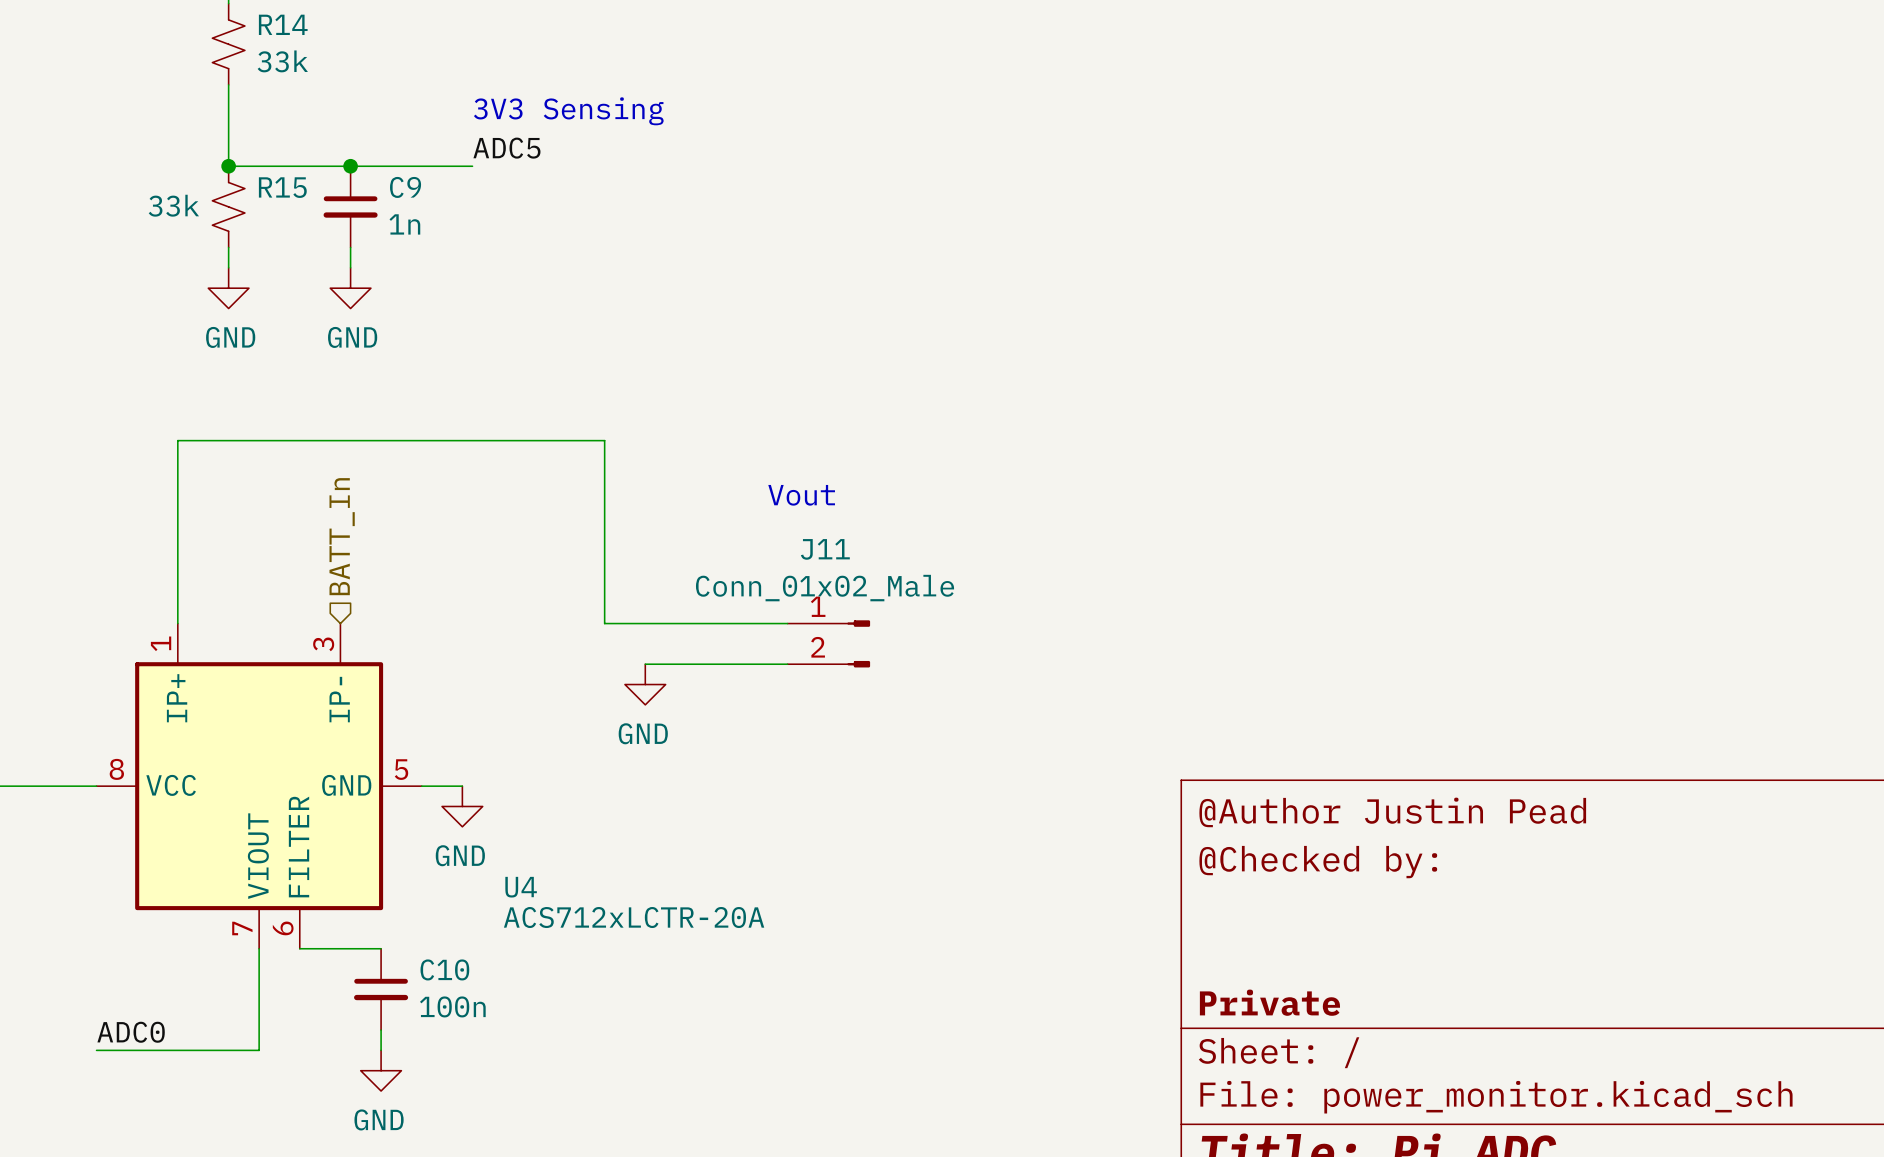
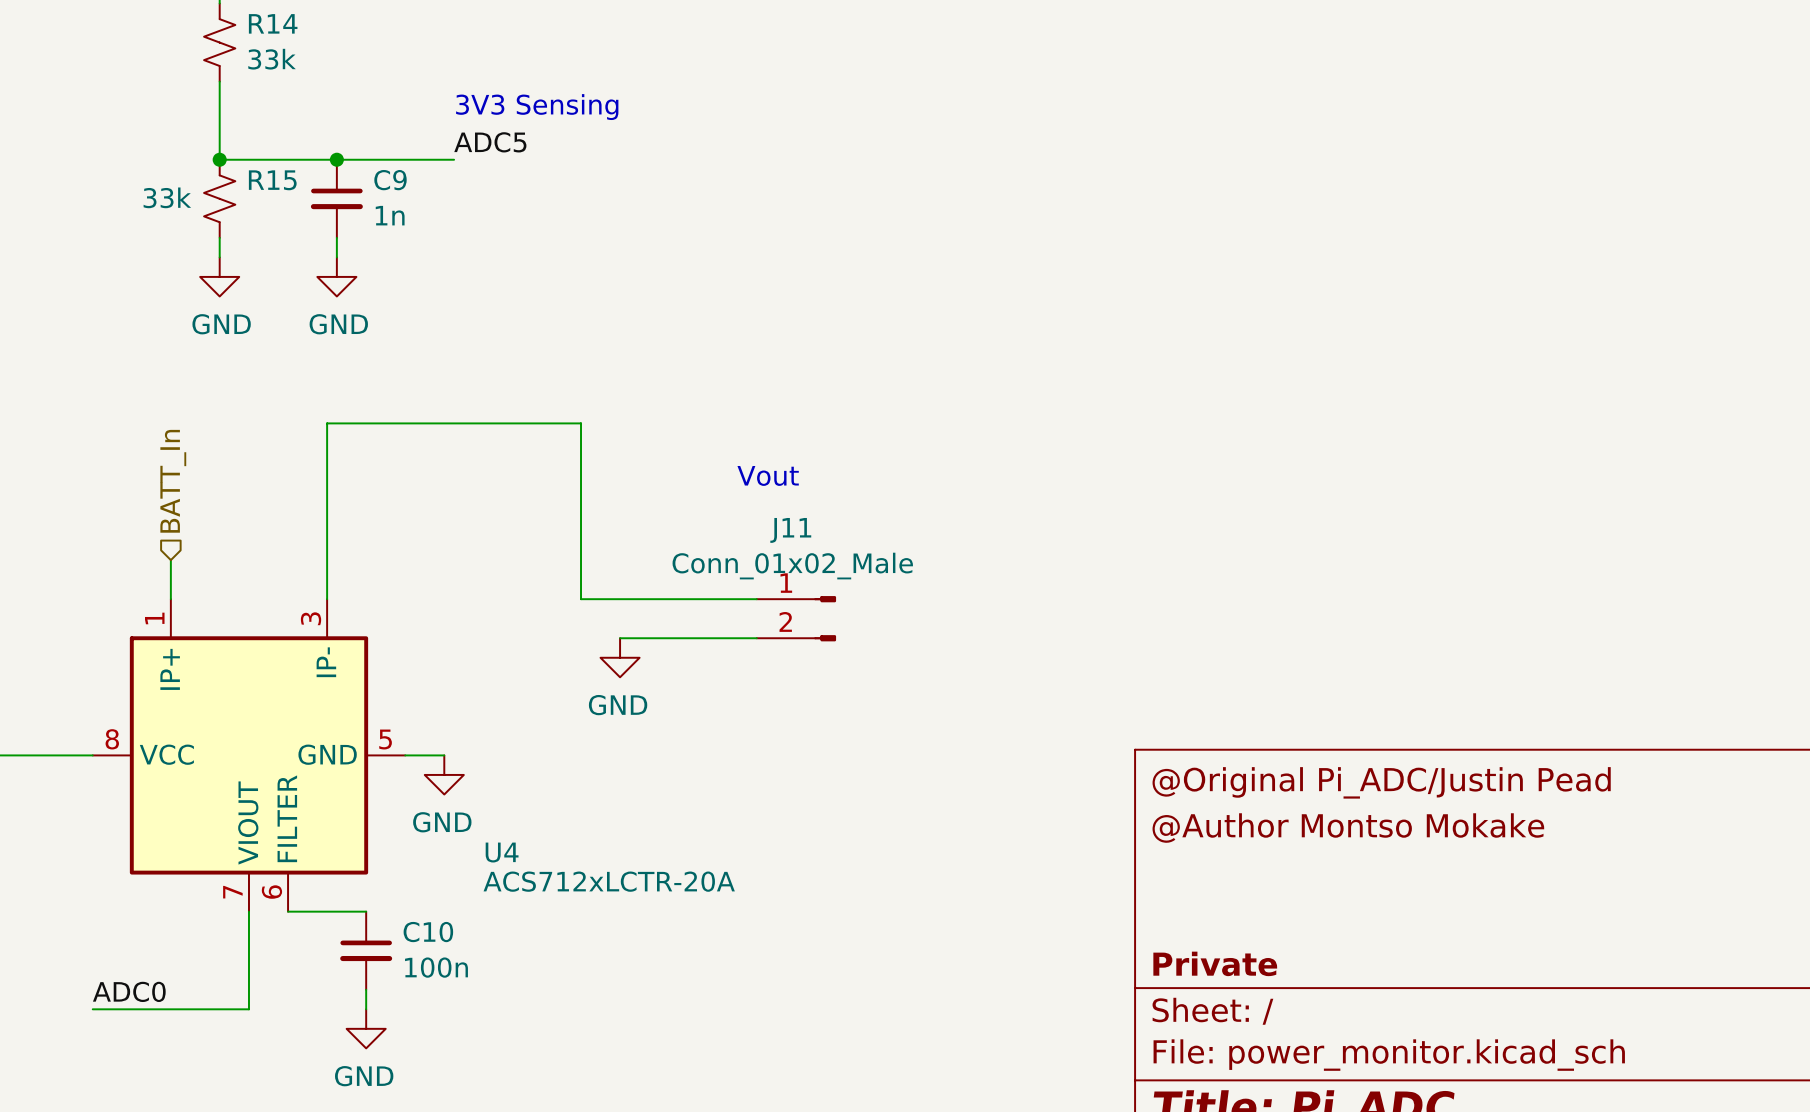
wire: (340, 440) (177, 440) (177, 582) -> (327, 423) (327, 599)
hierarchical label position: BATT_In (342, 536) -> BATT_In (173, 481)
title block: @Author Justin Pead (1392, 812) -> @Original Pi_ADC/Justin Pead (1381, 782)
title block: @Checked by: (1318, 862) -> @Author Montso Mokake (1348, 828)

